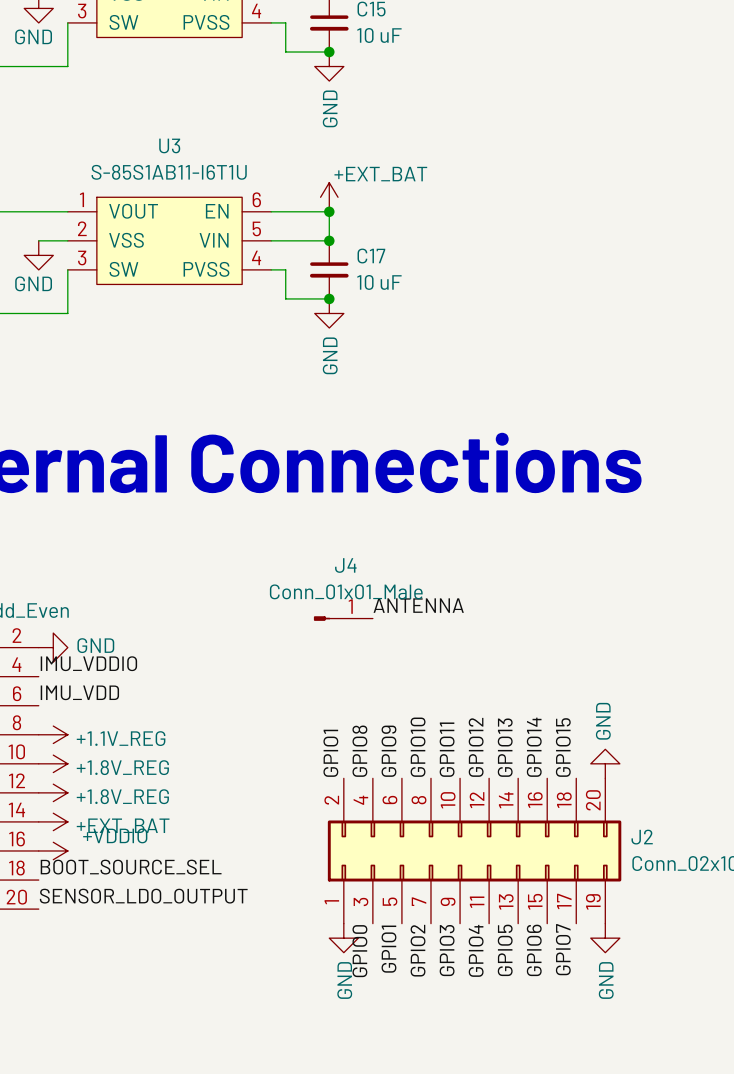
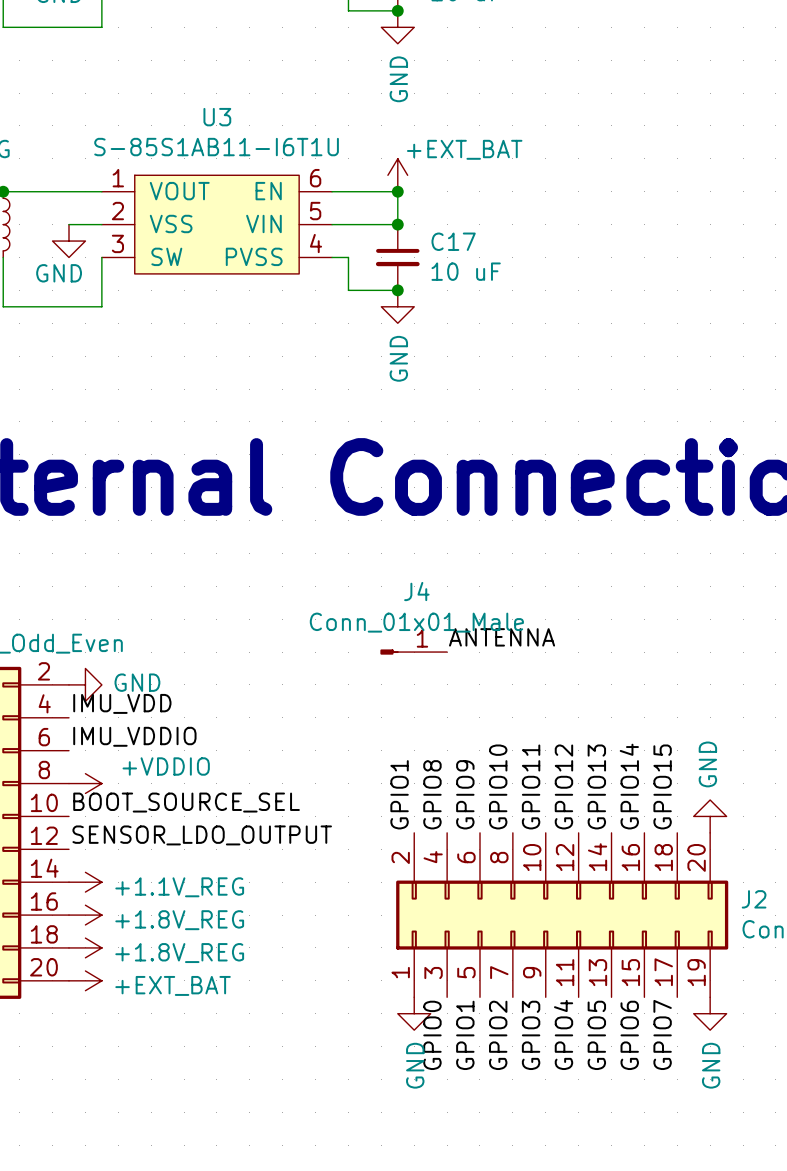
label: IMU_VDDIO (88, 663) -> IMU_VDD (122, 703)
label: IMU_VDD (79, 692) -> IMU_VDDIO (134, 736)
power symbol: +1.1V_REG (53, 734) -> +VDDIO (85, 783)
power symbol: +1.8V_REG (53, 763) -> none
power symbol: +1.8V_REG (53, 792) -> none
power symbol: +EXT_BAT (53, 821) -> +1.1V_REG (85, 882)
power symbol: +VDDIO (53, 850) -> +1.8V_REG (85, 915)
label position: BOOT_SOURCE_SEL (131, 867) -> BOOT_SOURCE_SEL (186, 802)
power symbol: none -> +1.8V_REG (85, 947)
label position: SENSOR_LDO_OUTPUT (143, 896) -> SENSOR_LDO_OUTPUT (202, 835)
power symbol: none -> +EXT_BAT (85, 980)

